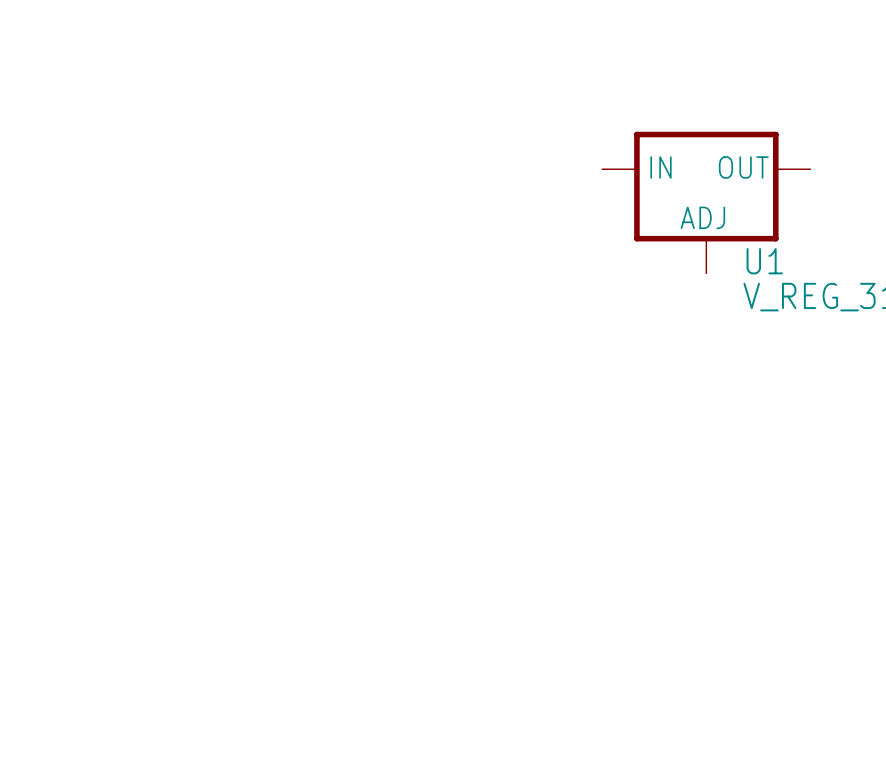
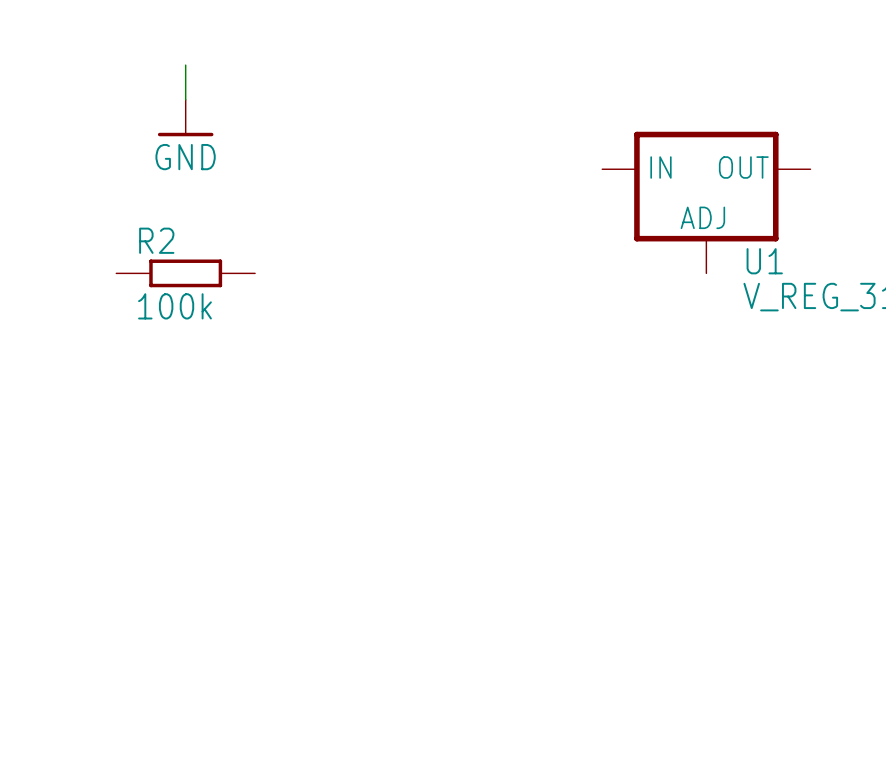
wire: none -> (185, 65) (185, 99)
power symbol: none -> GND (185, 118)
R2: none -> 100k (185, 273)

